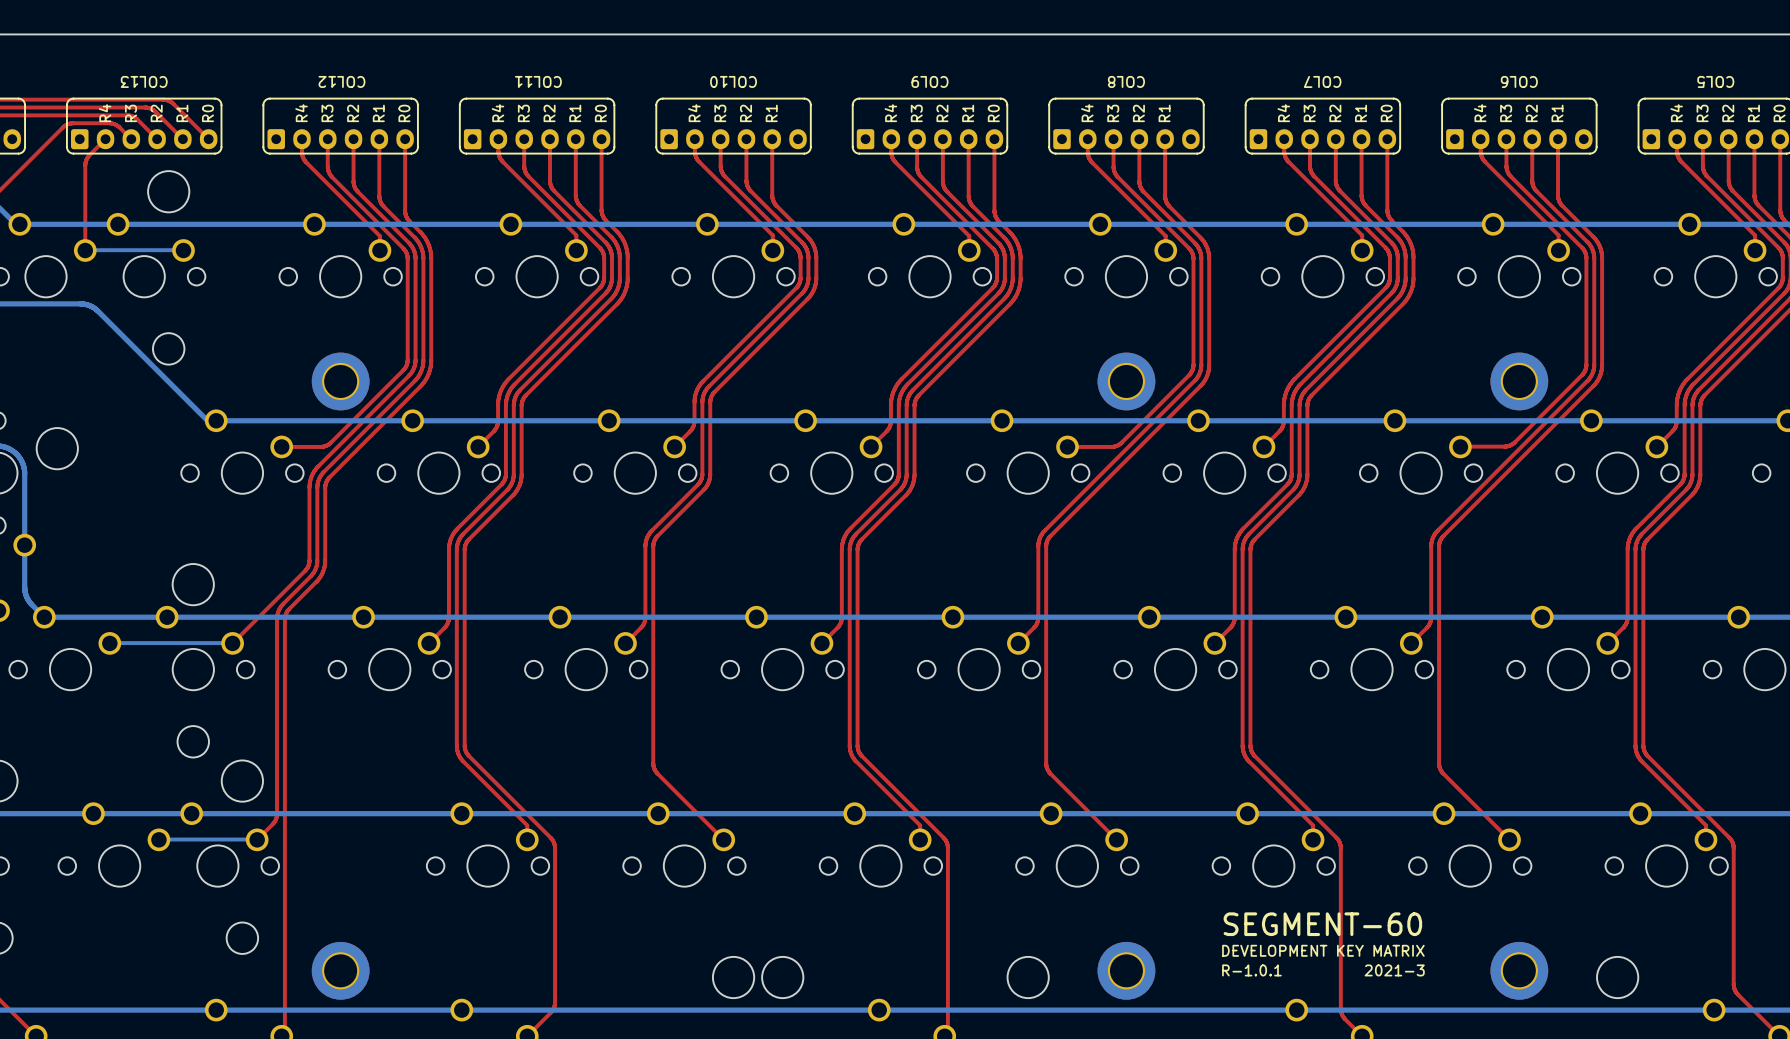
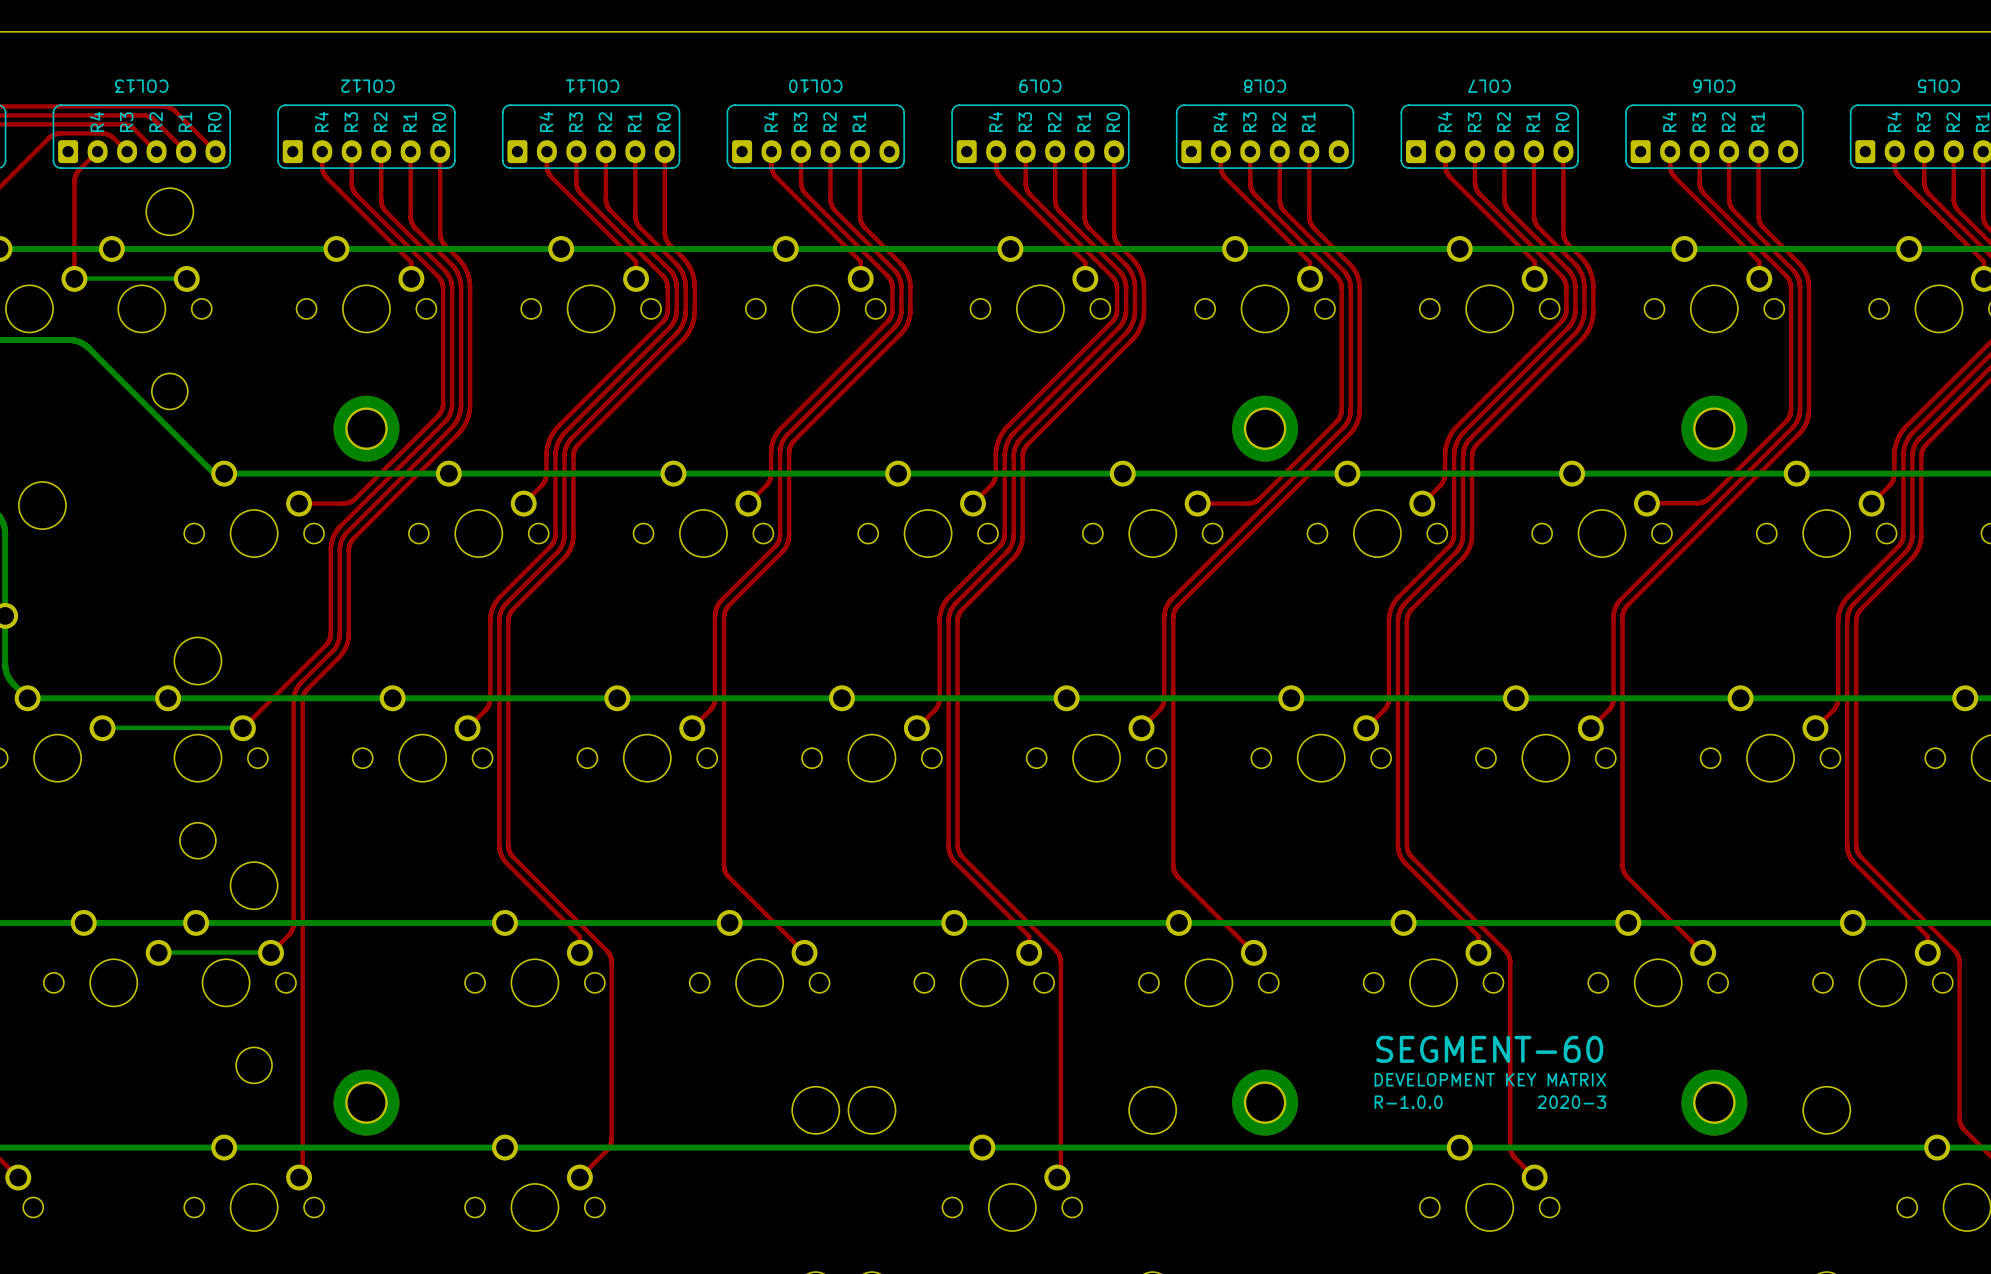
text: R-1.0.1 (1251, 970) -> R-1.0.0 (1408, 1102)
text: 2021-3 (1394, 970) -> 2020-3 (1571, 1102)

